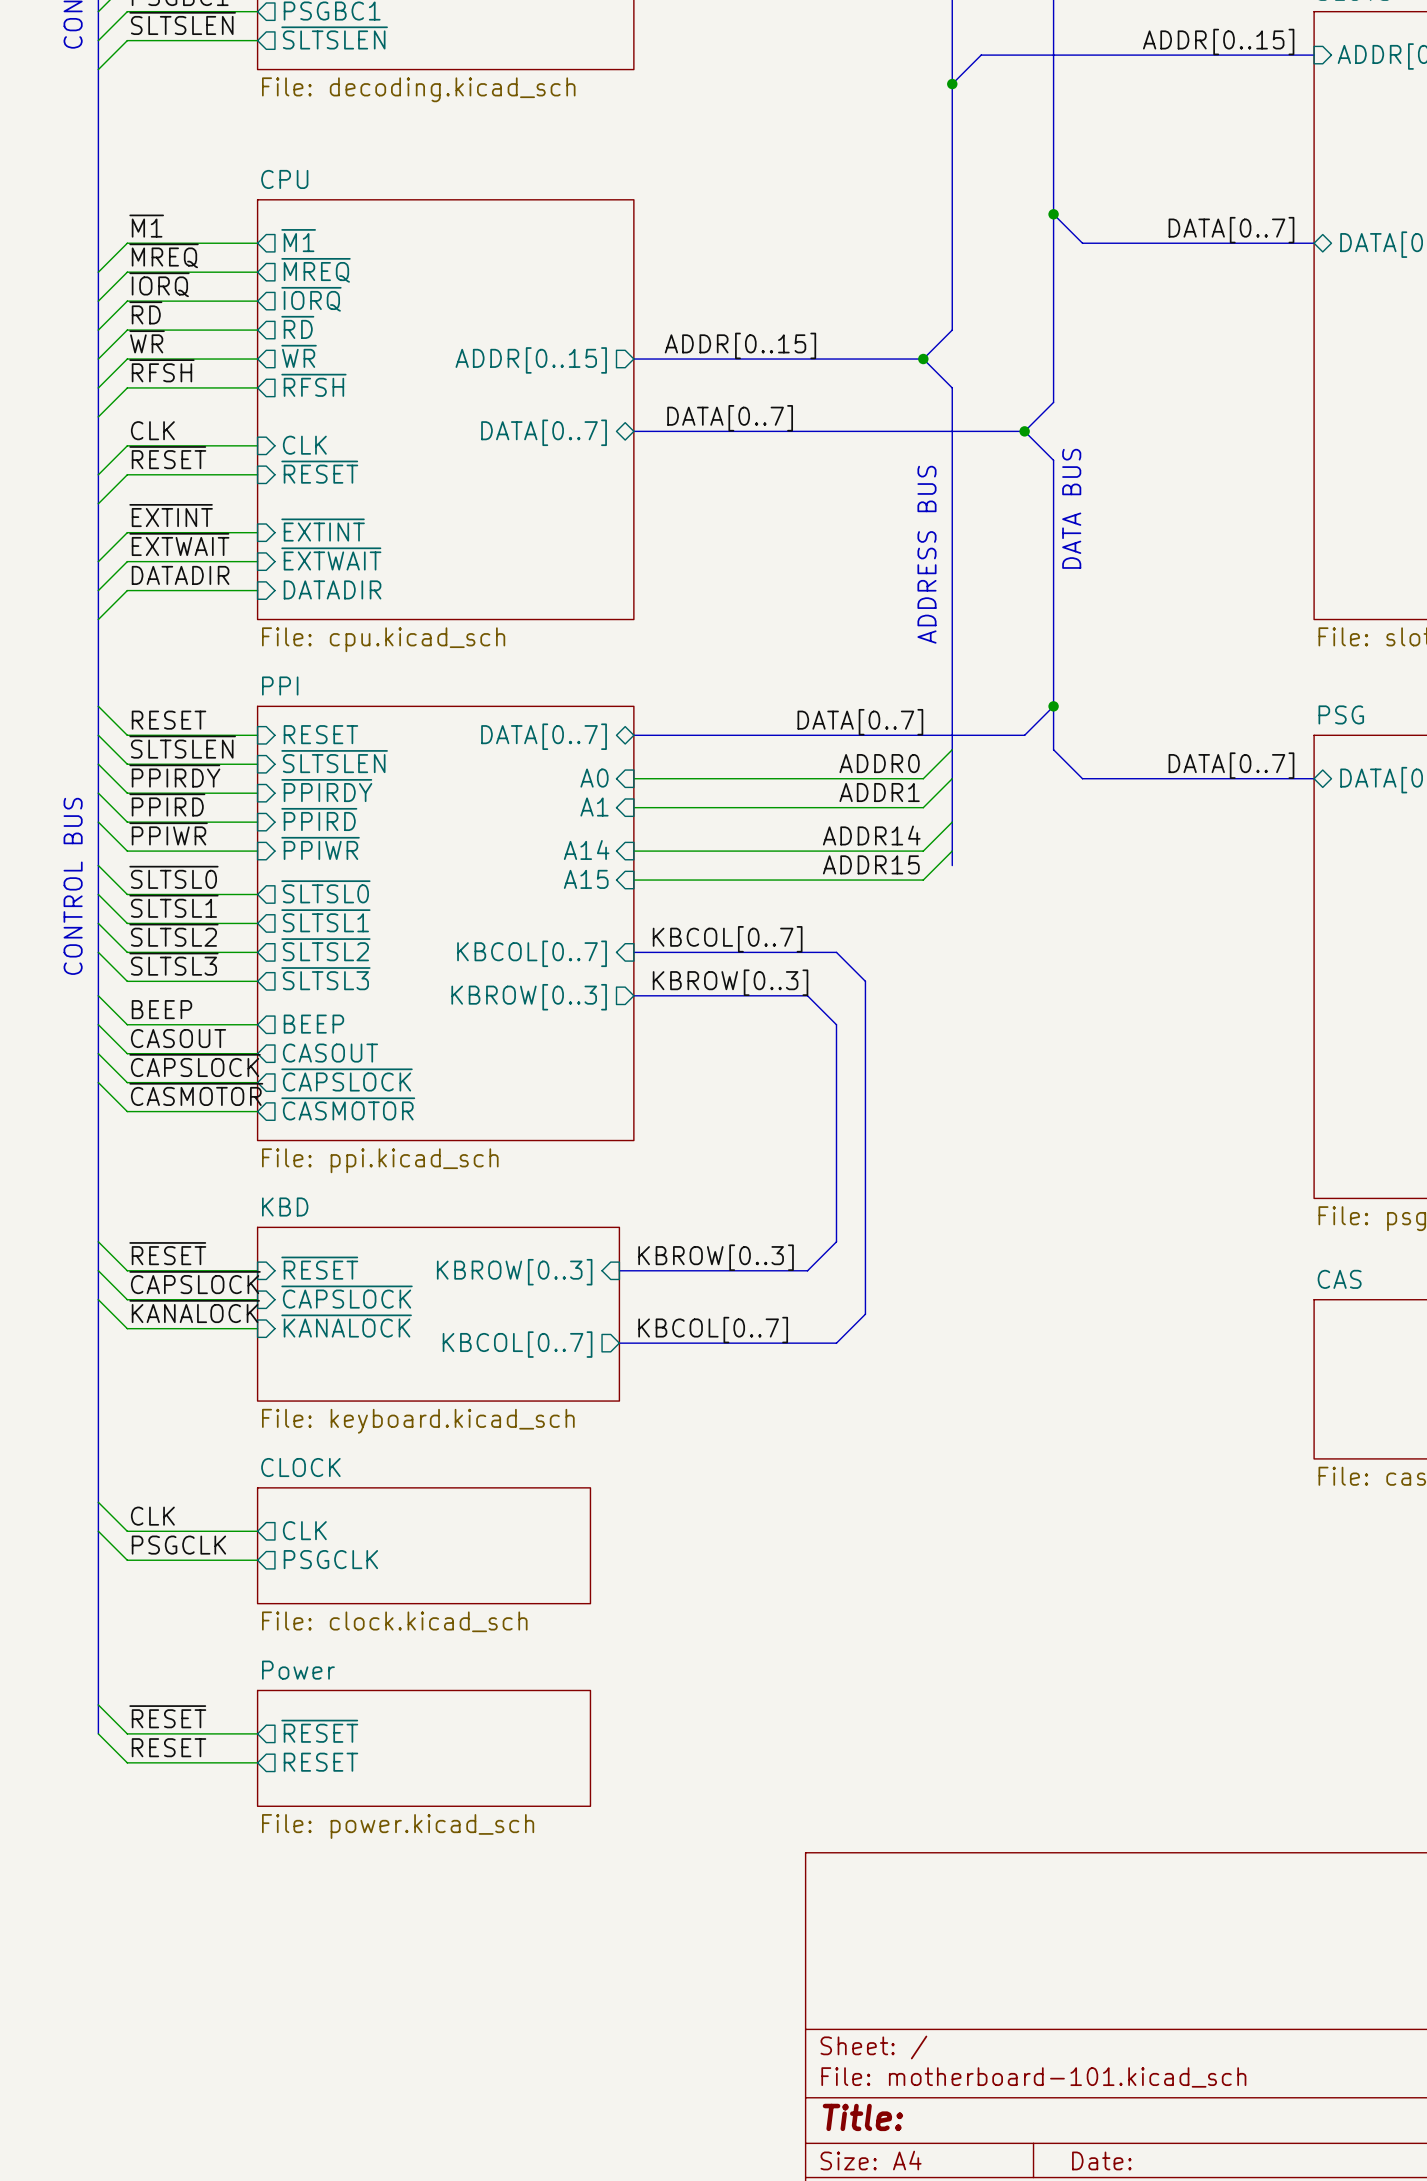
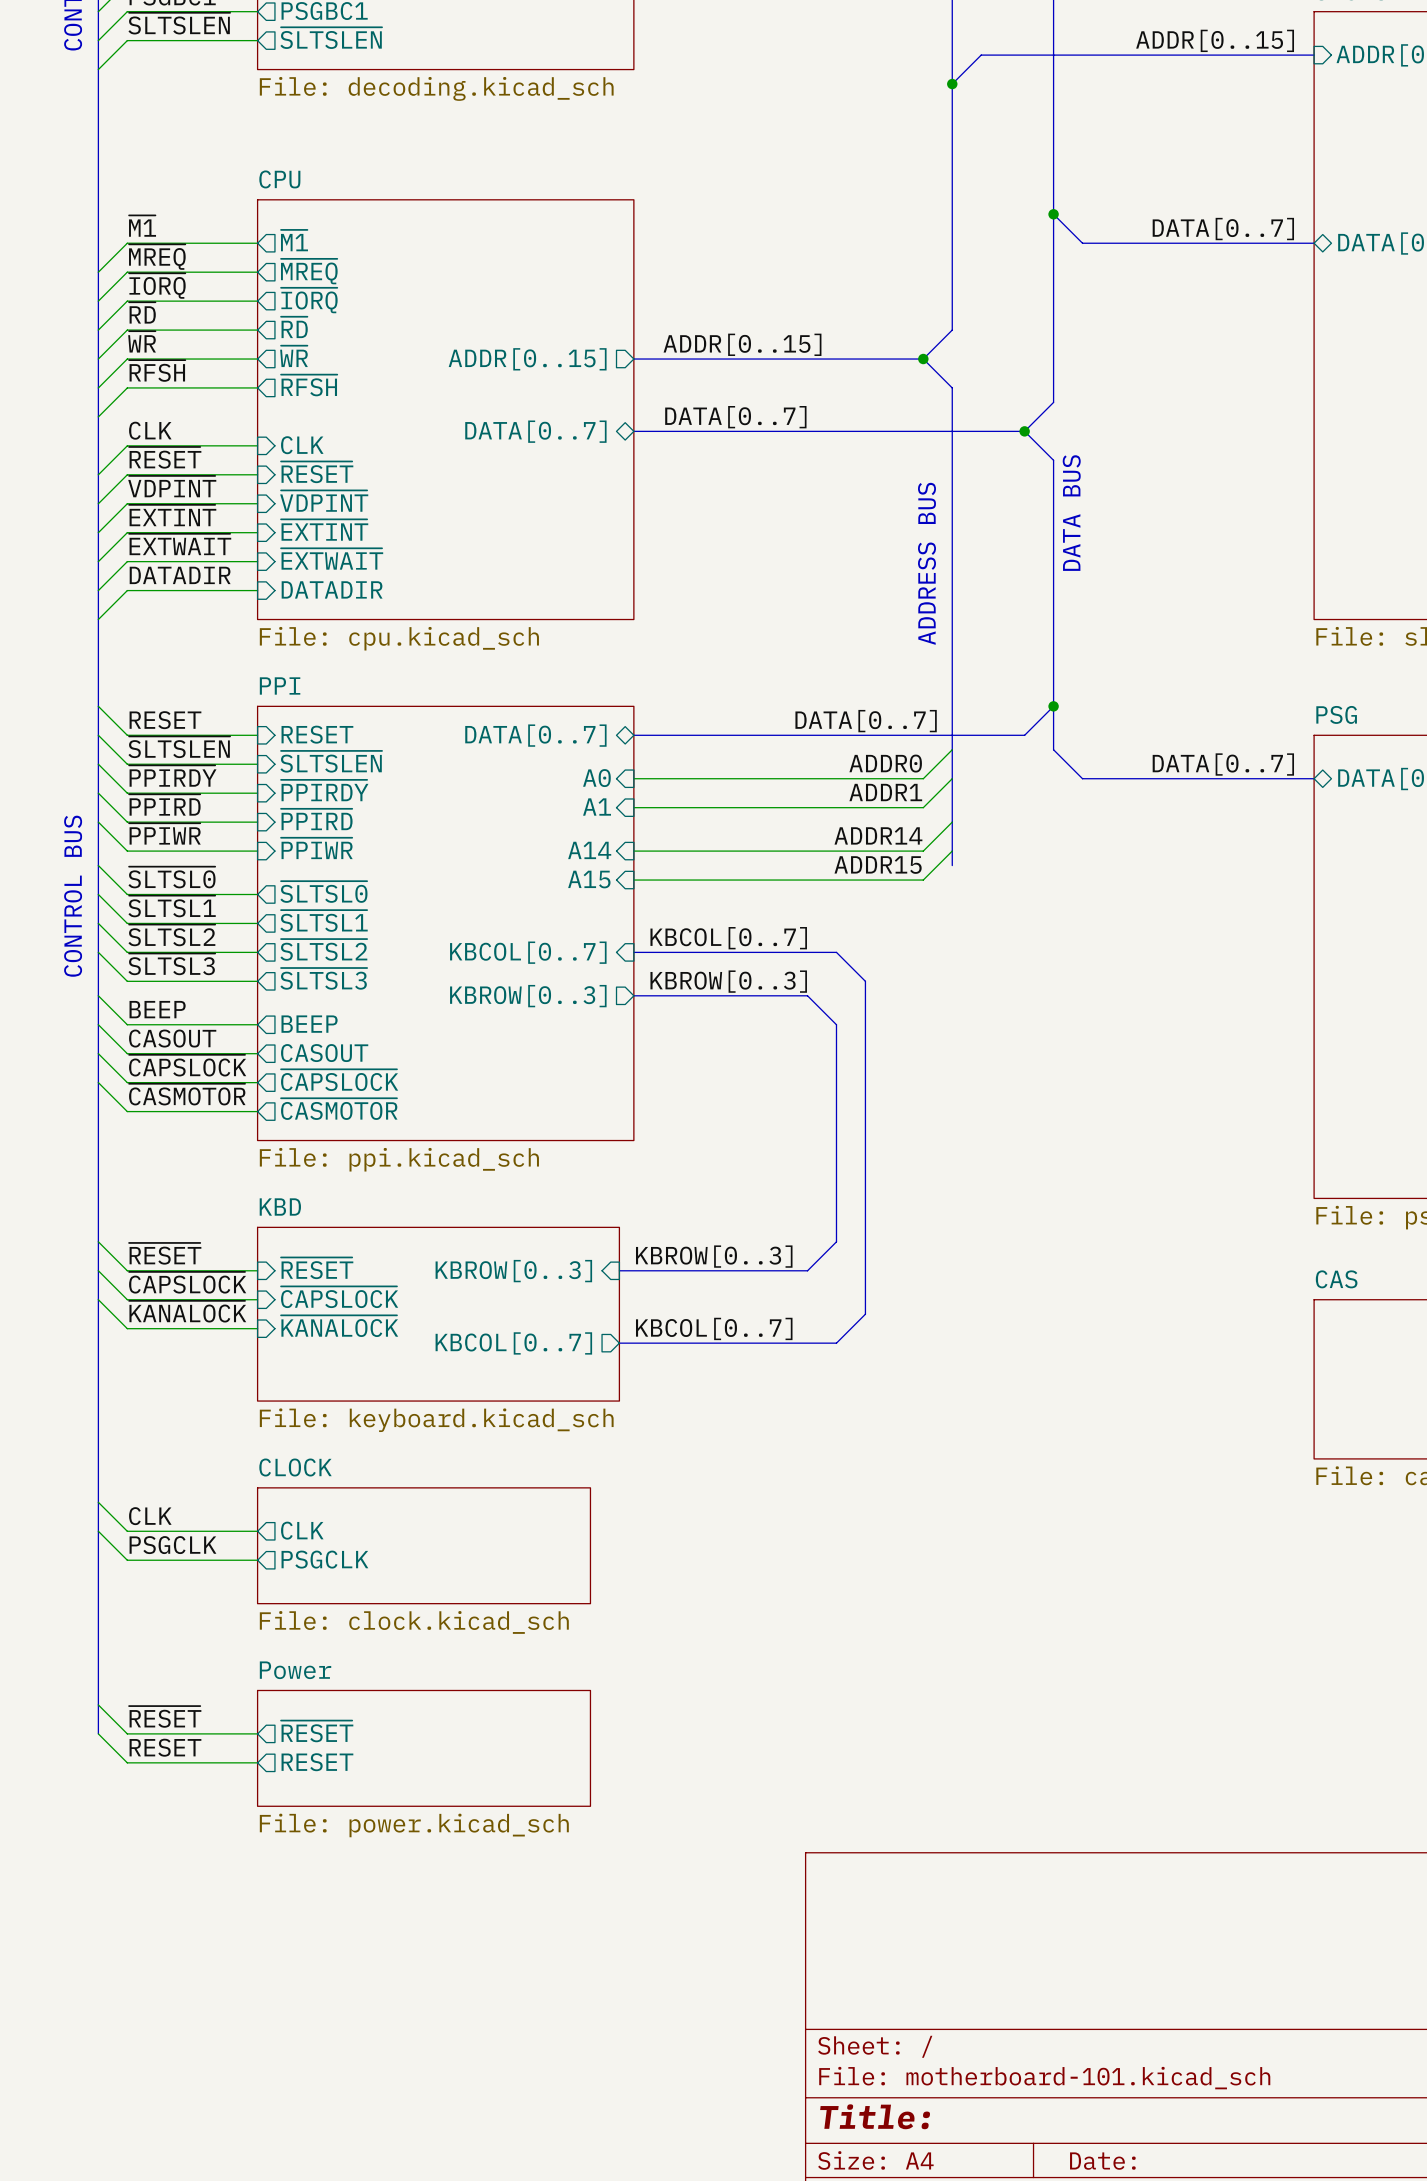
label: none -> ~{VDPINT} (172, 486)
sheet pin: none -> ~{VDPINT} (324, 501)
wire: none -> (257, 503) (127, 503) (98, 532)

